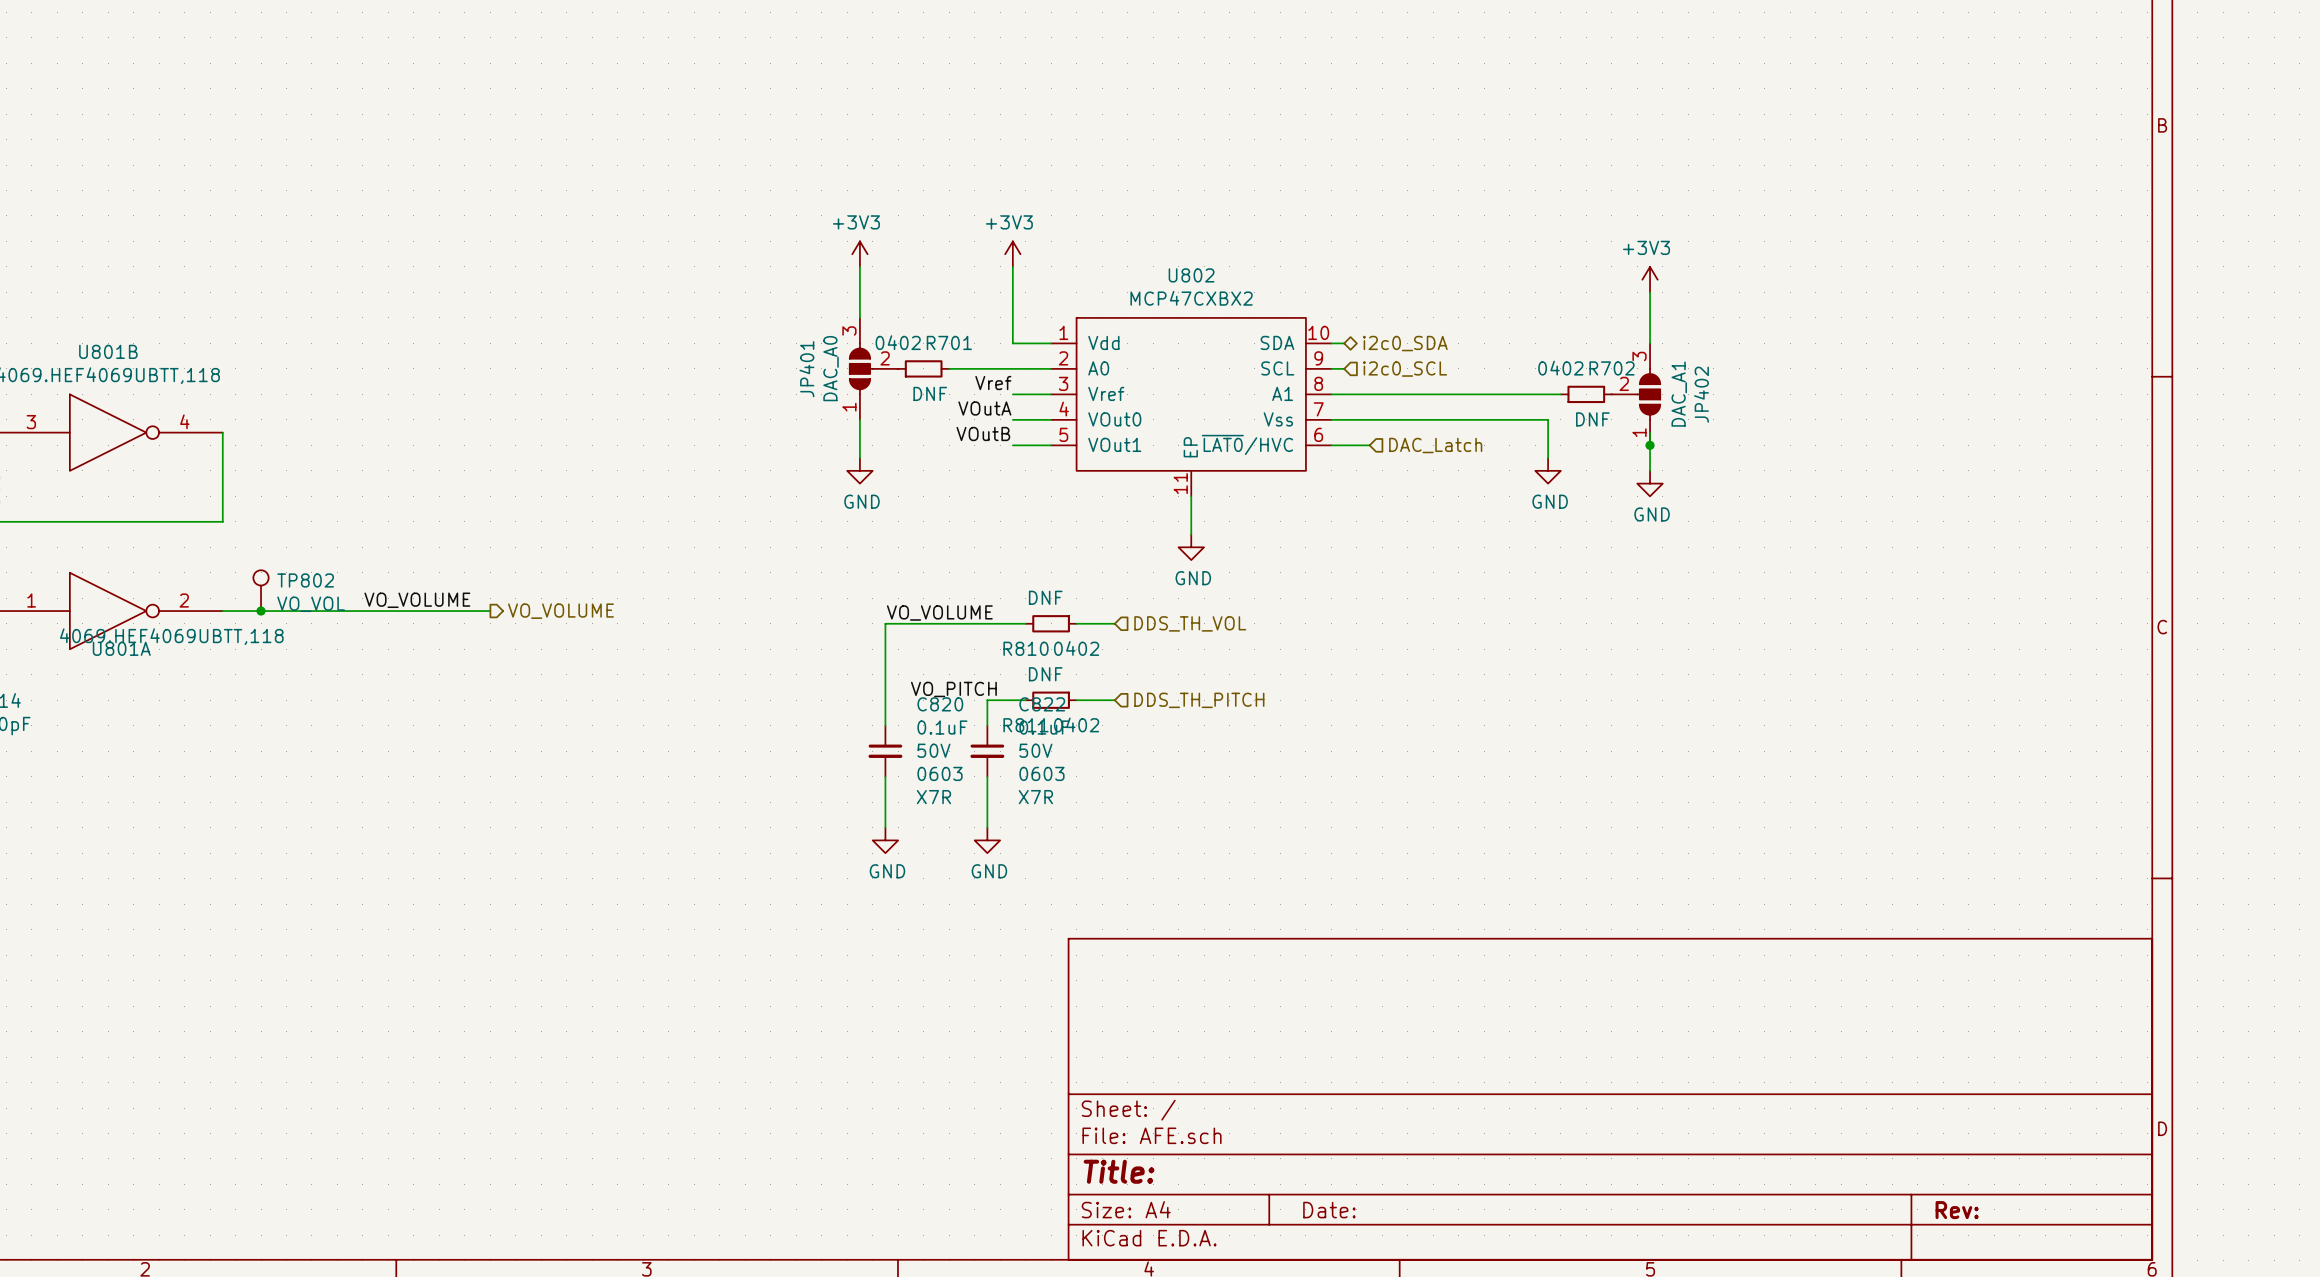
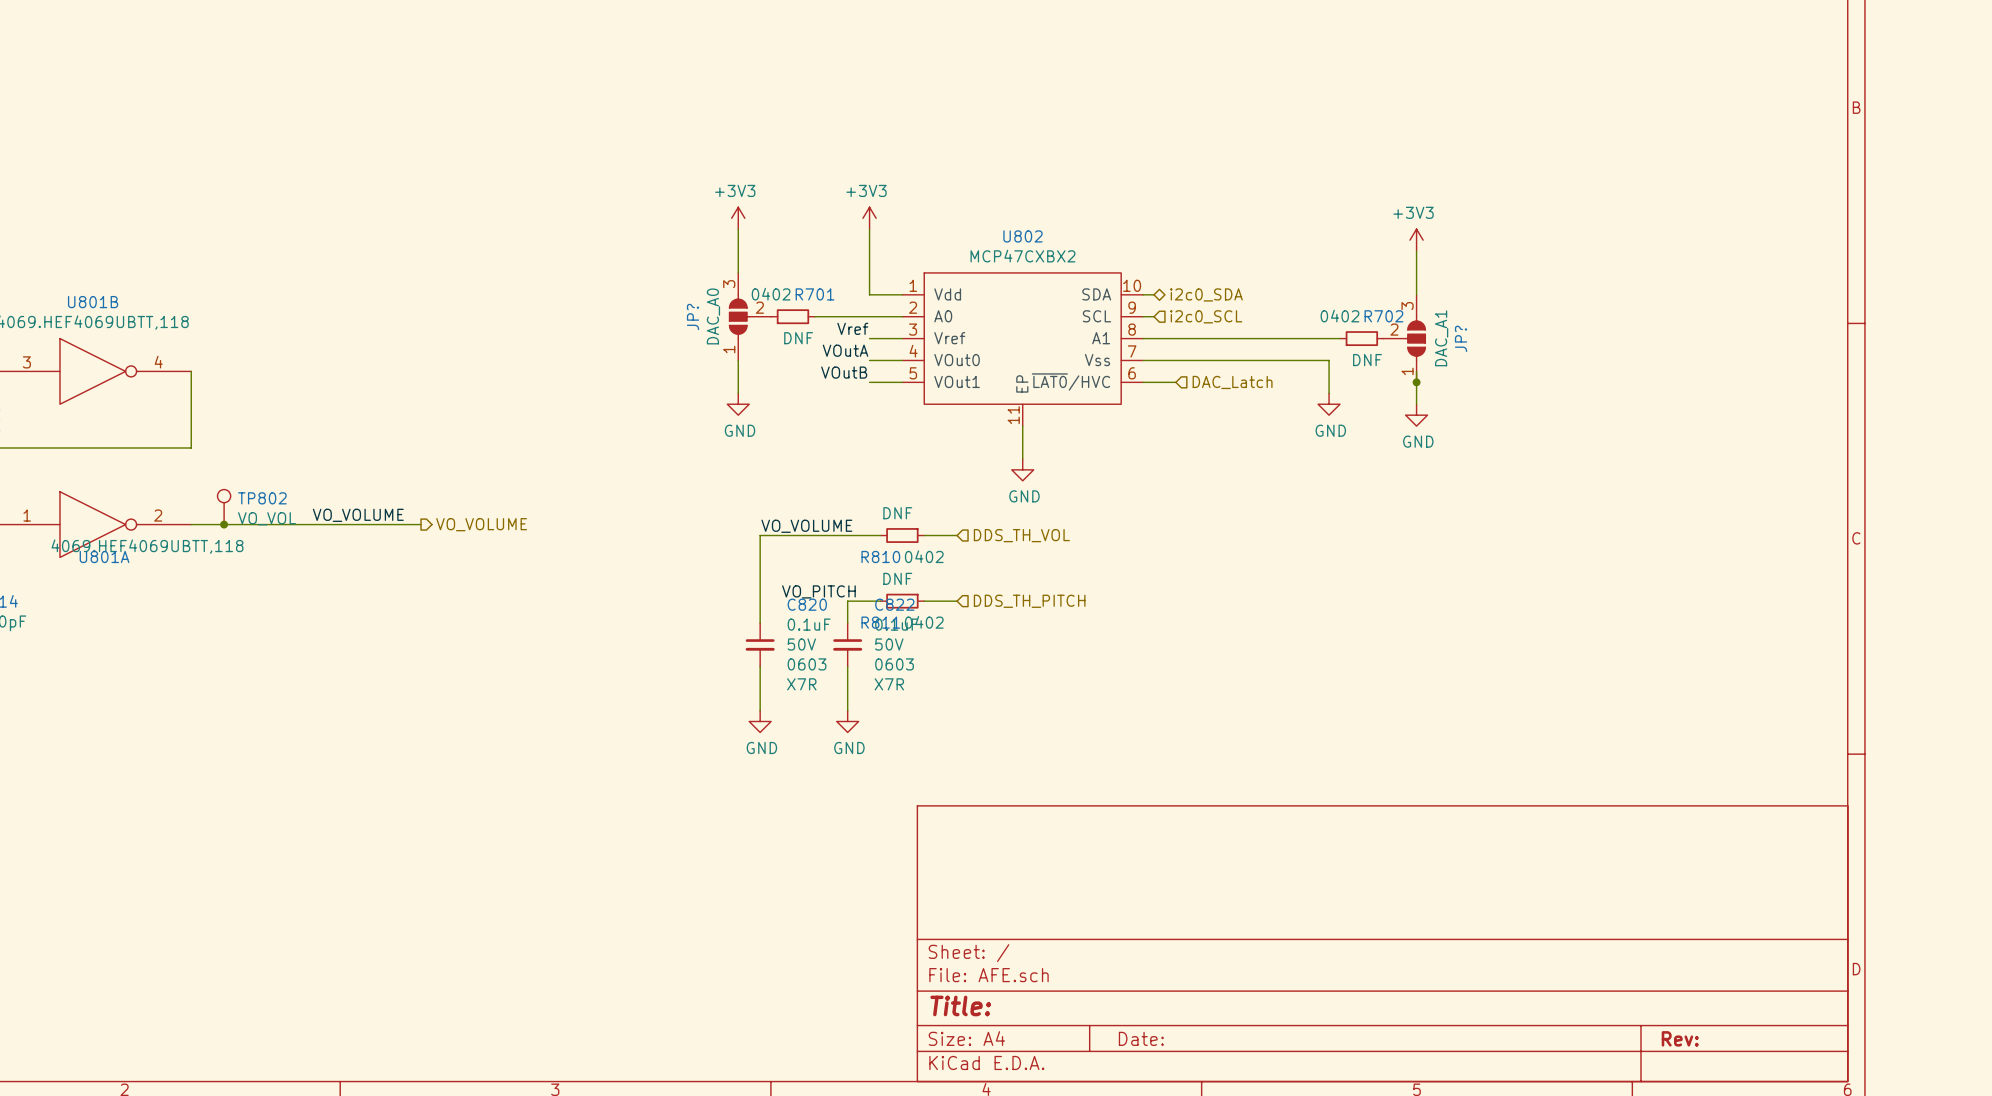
JP401 name: JP401 (806, 369) -> JP? (693, 316)
JP402 name: JP402 (1701, 394) -> JP? (1461, 338)

